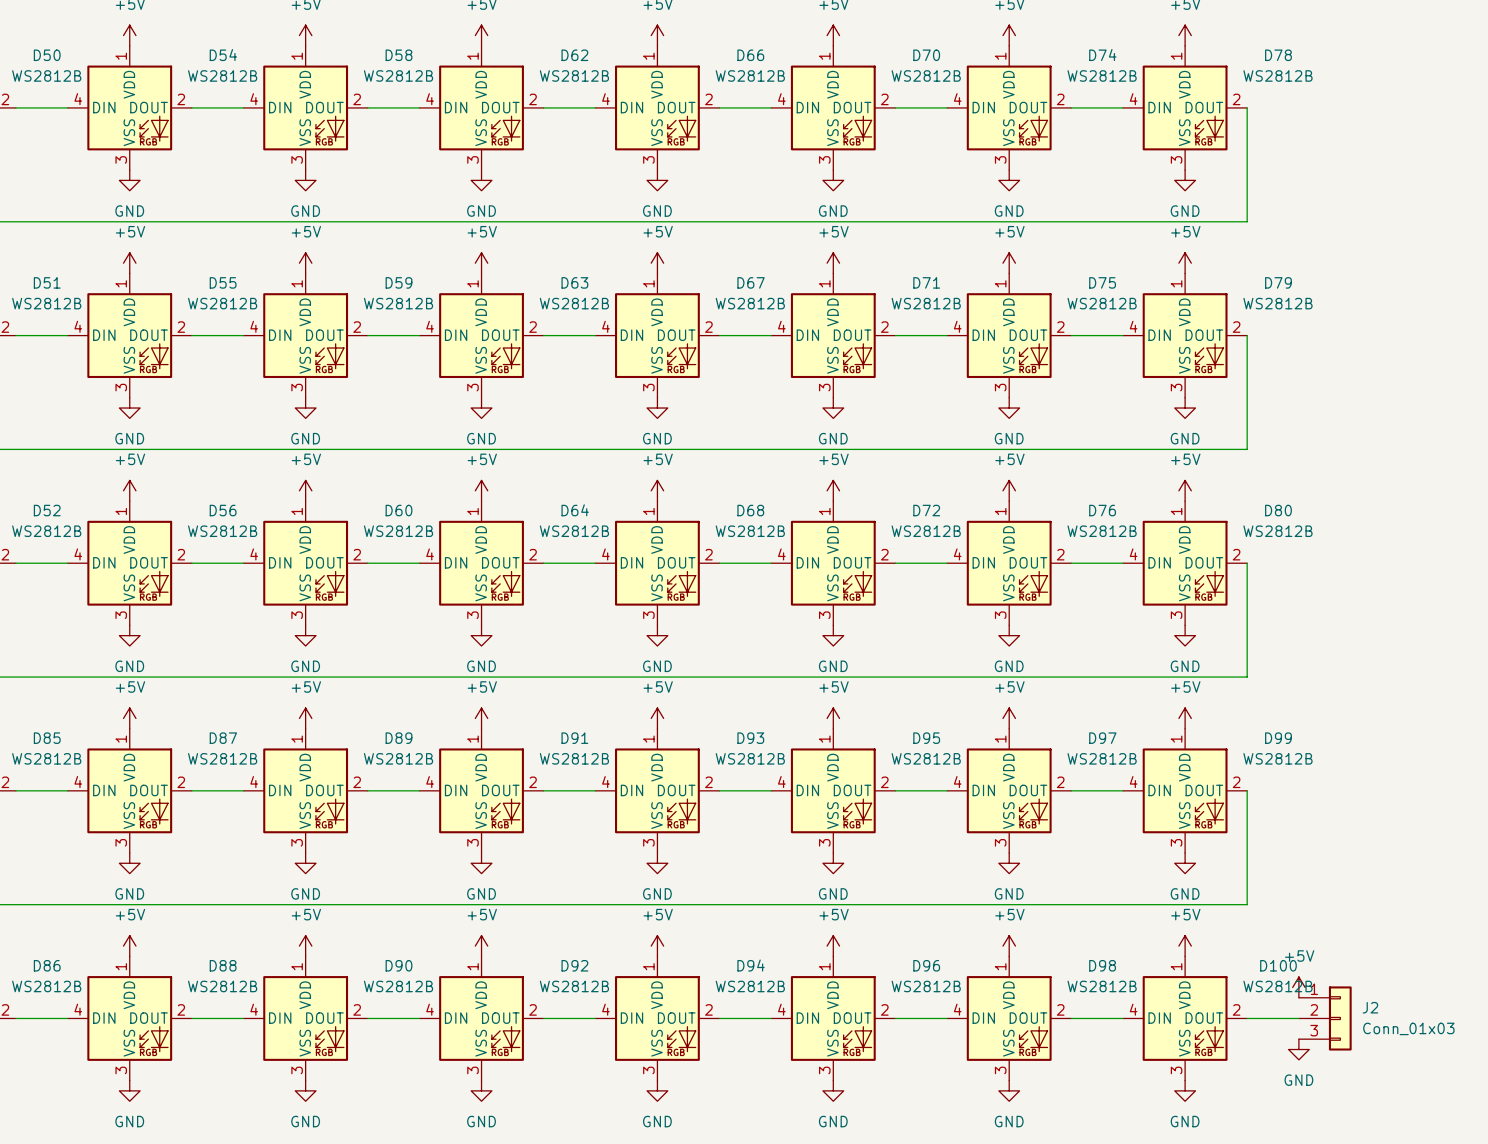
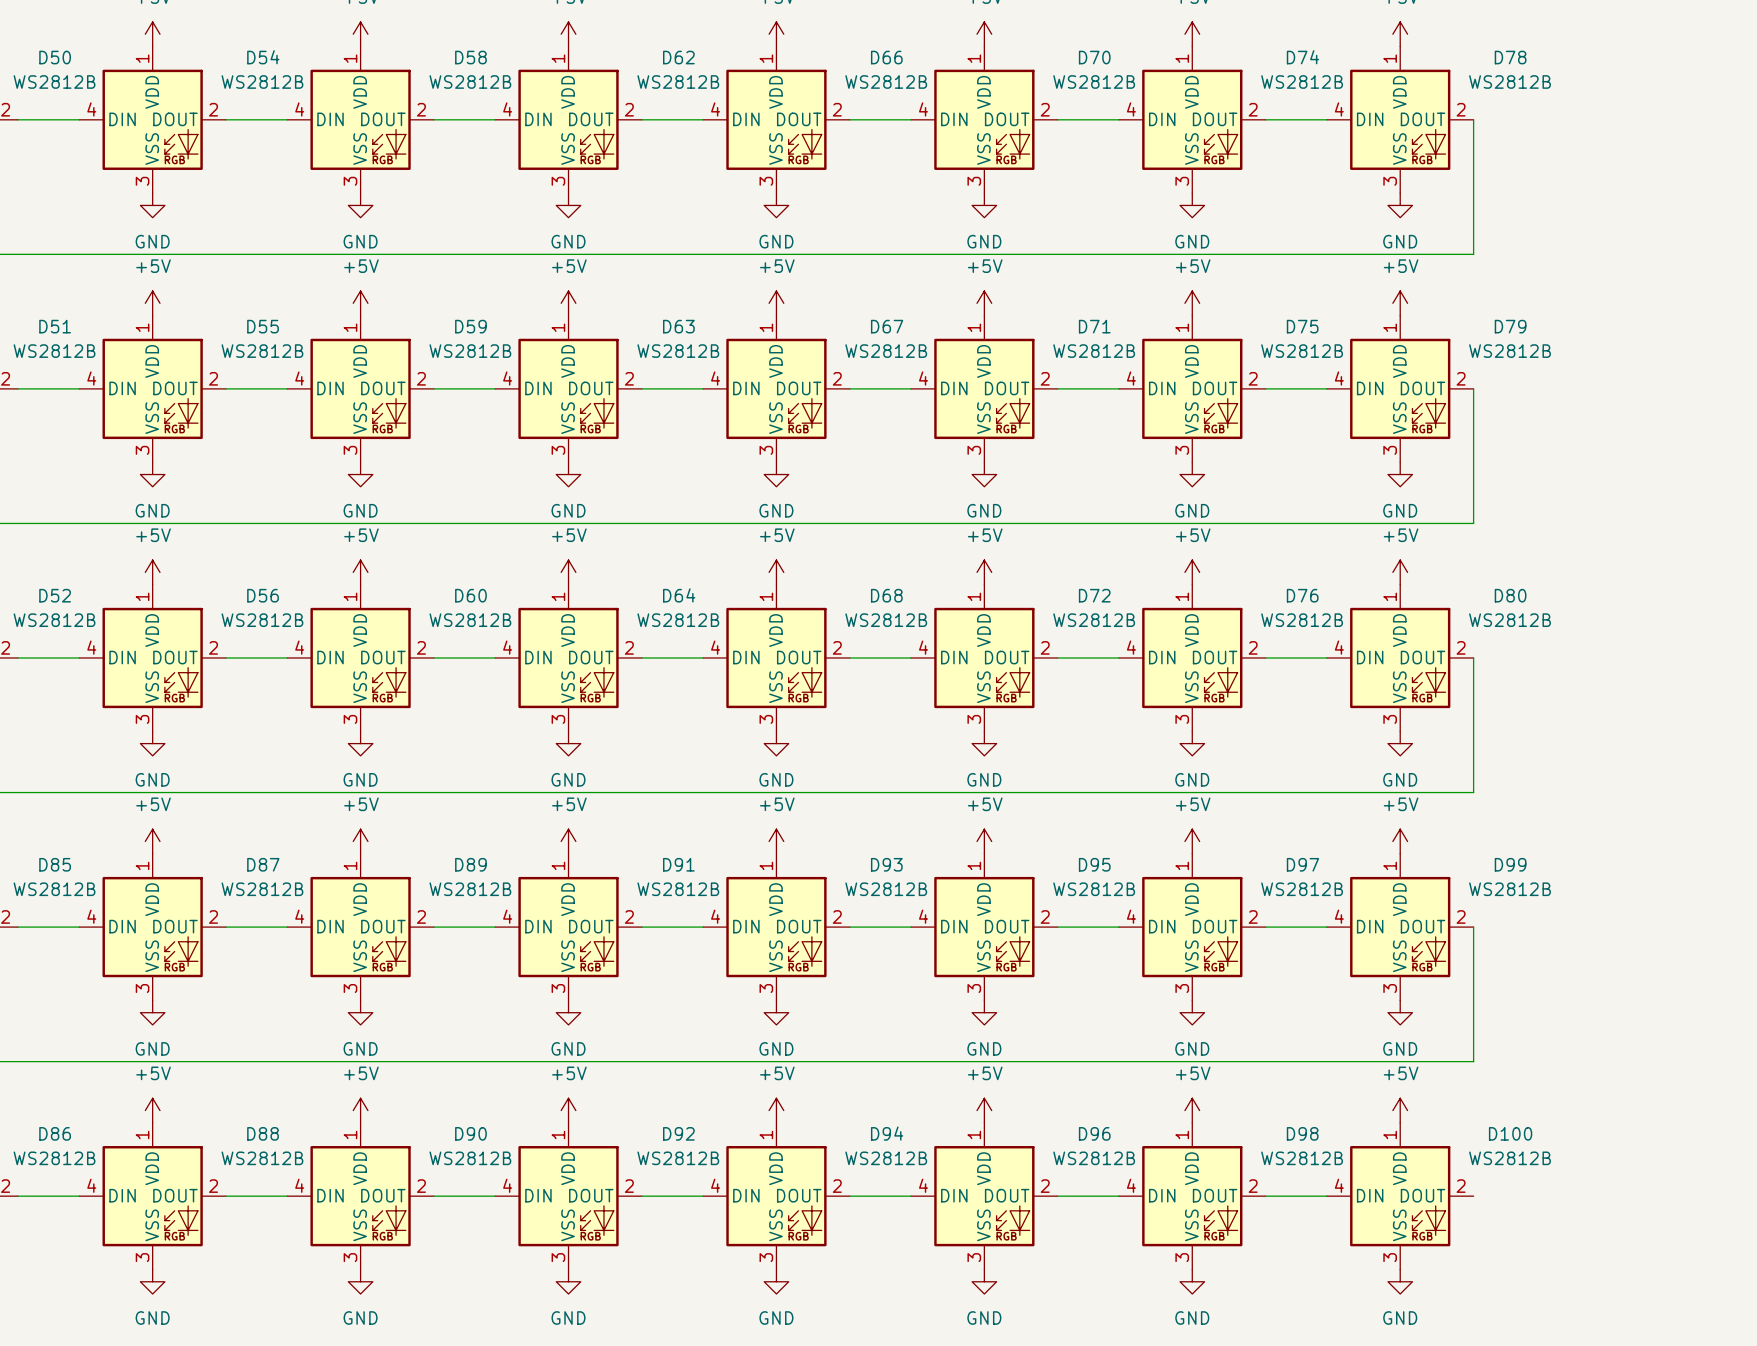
power symbol: +5V (1298, 987) -> none
wire: (1247, 1018) (1298, 1018) -> none
J2: Conn_01x03 (1325, 1018) -> none
power symbol: GND (1298, 1049) -> none

